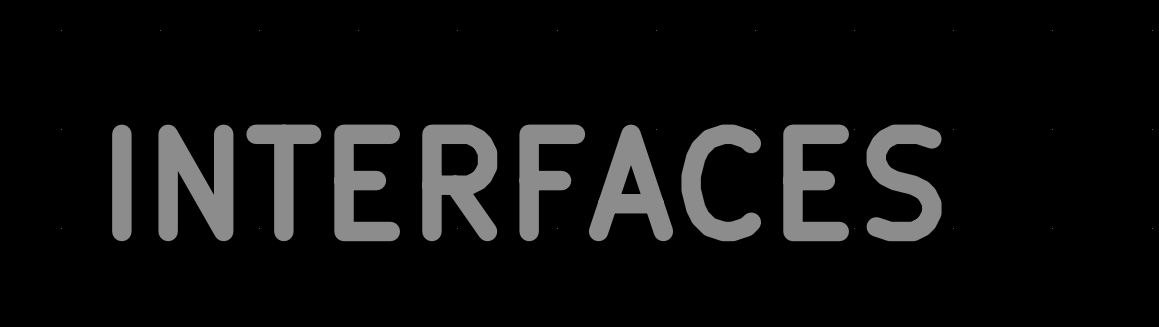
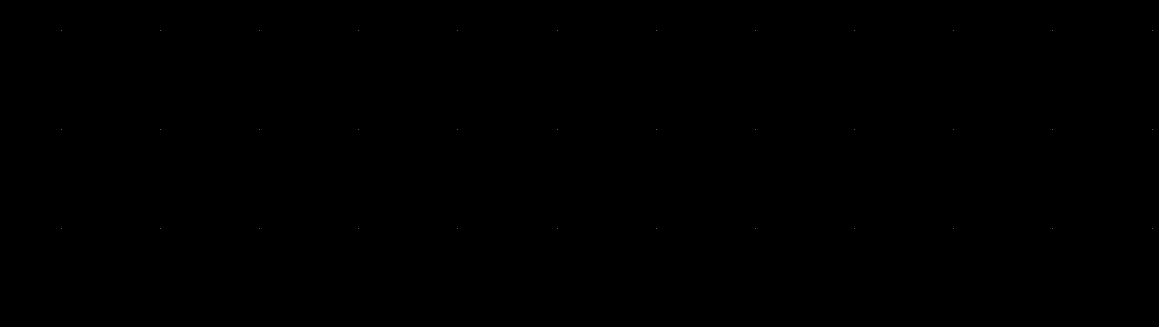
text: INTERFACES (526, 182) -> none

